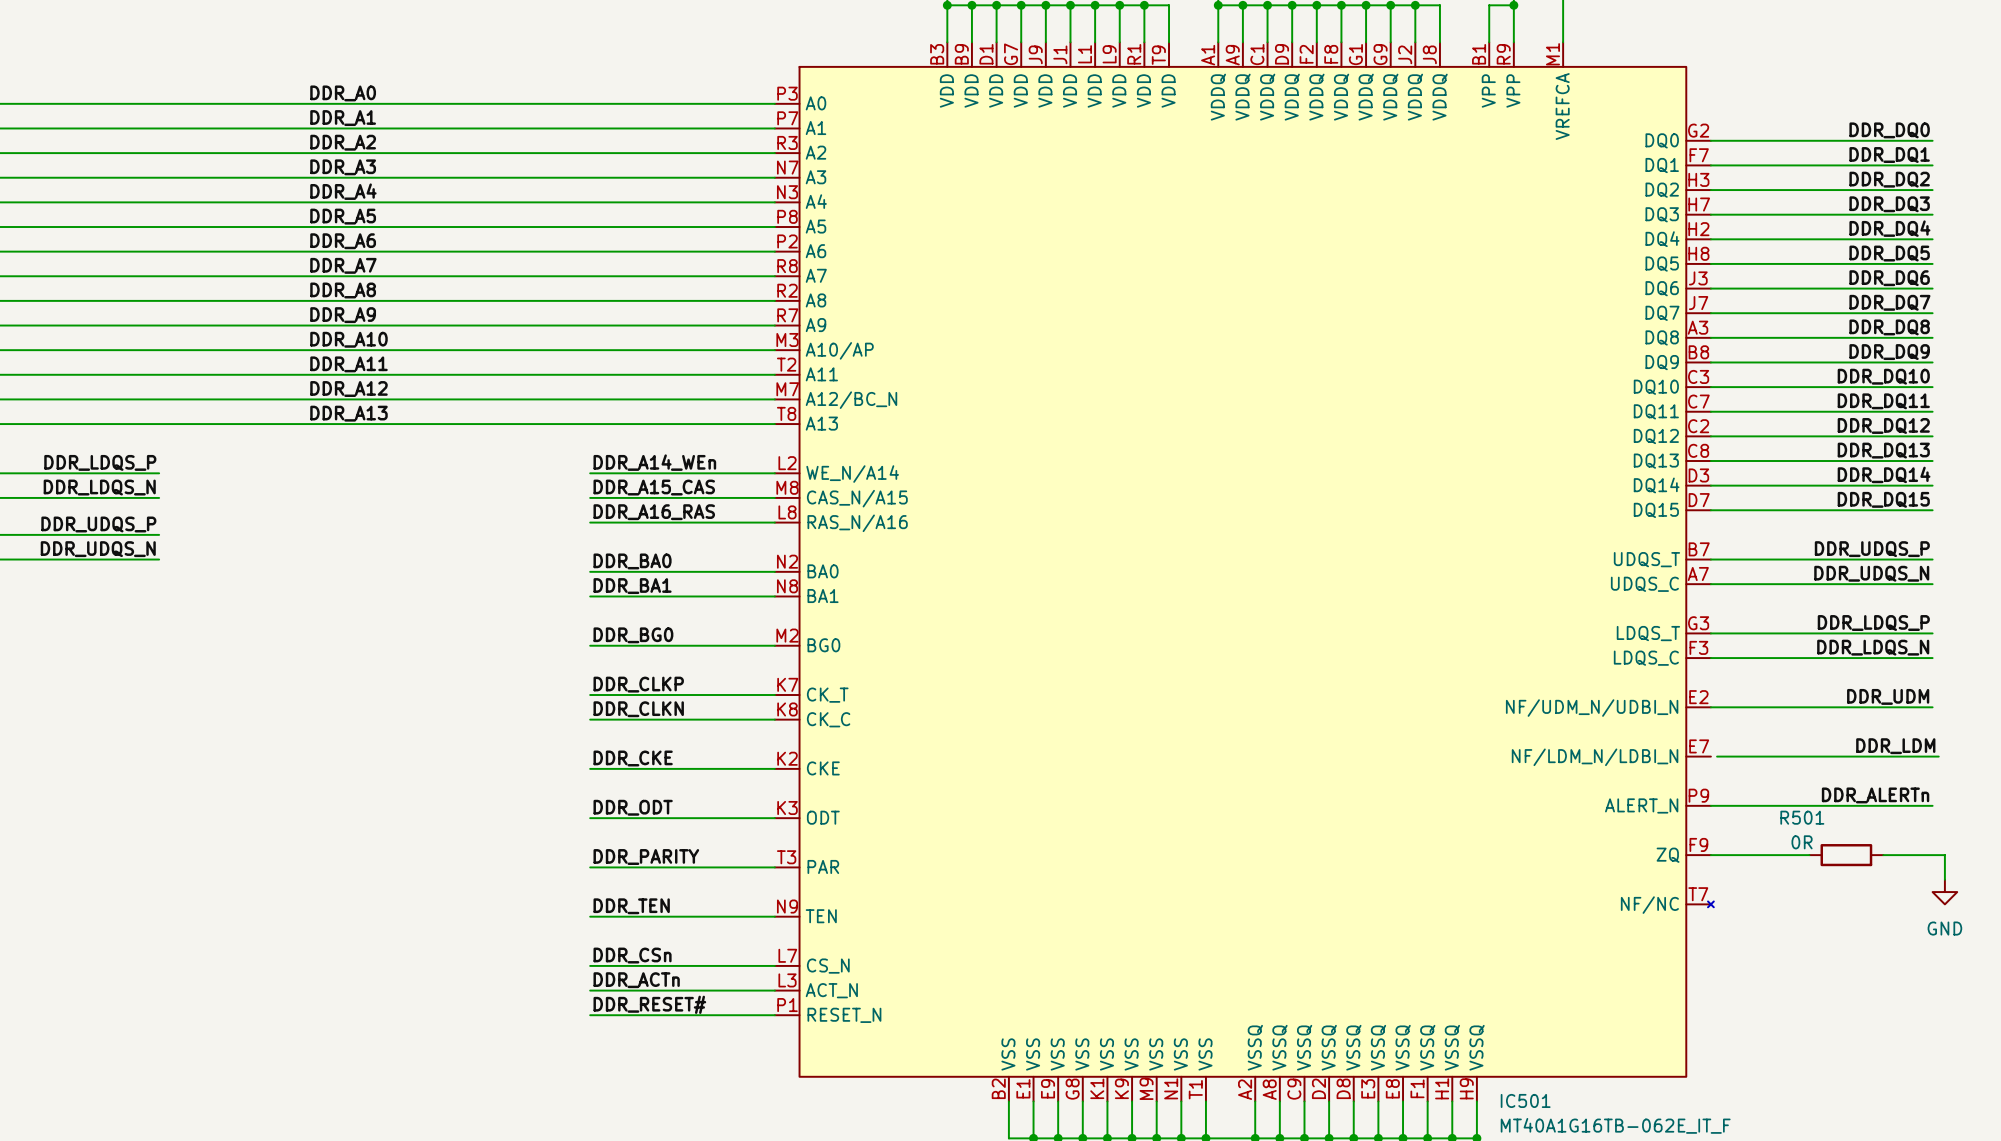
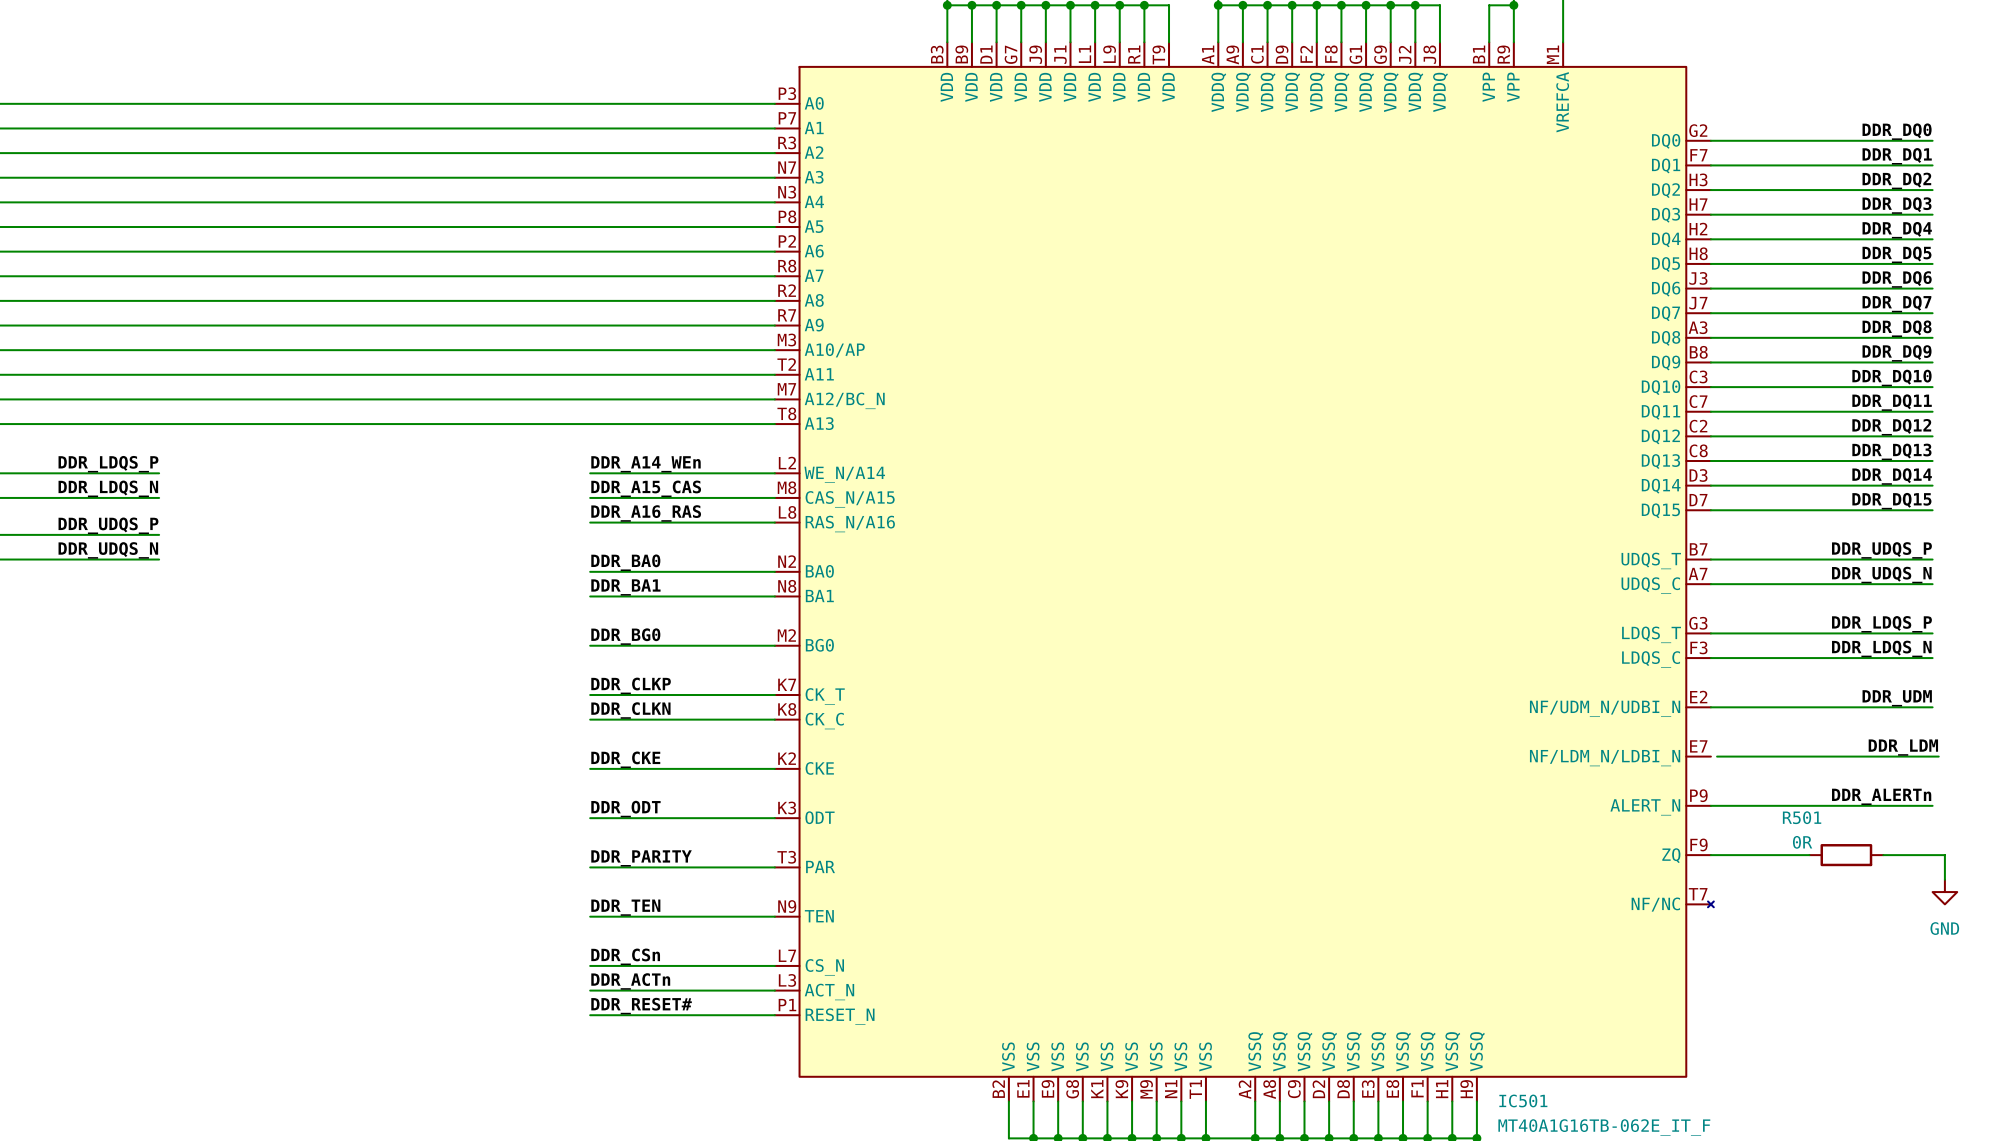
label: DDR_A0 (343, 93) -> none
label: DDR_A1 (343, 118) -> none
label: DDR_A2 (343, 142) -> none
label: DDR_A3 (343, 167) -> none
label: DDR_A4 (343, 191) -> none
label: DDR_A5 (343, 216) -> none
label: DDR_A6 (343, 241) -> none
label: DDR_A7 (343, 265) -> none
label: DDR_A8 (343, 290) -> none
label: DDR_A9 (343, 315) -> none
label: DDR_A10 (348, 339) -> none
label: DDR_A11 (348, 364) -> none
label: DDR_A12 (348, 389) -> none
label: DDR_A13 (348, 413) -> none

